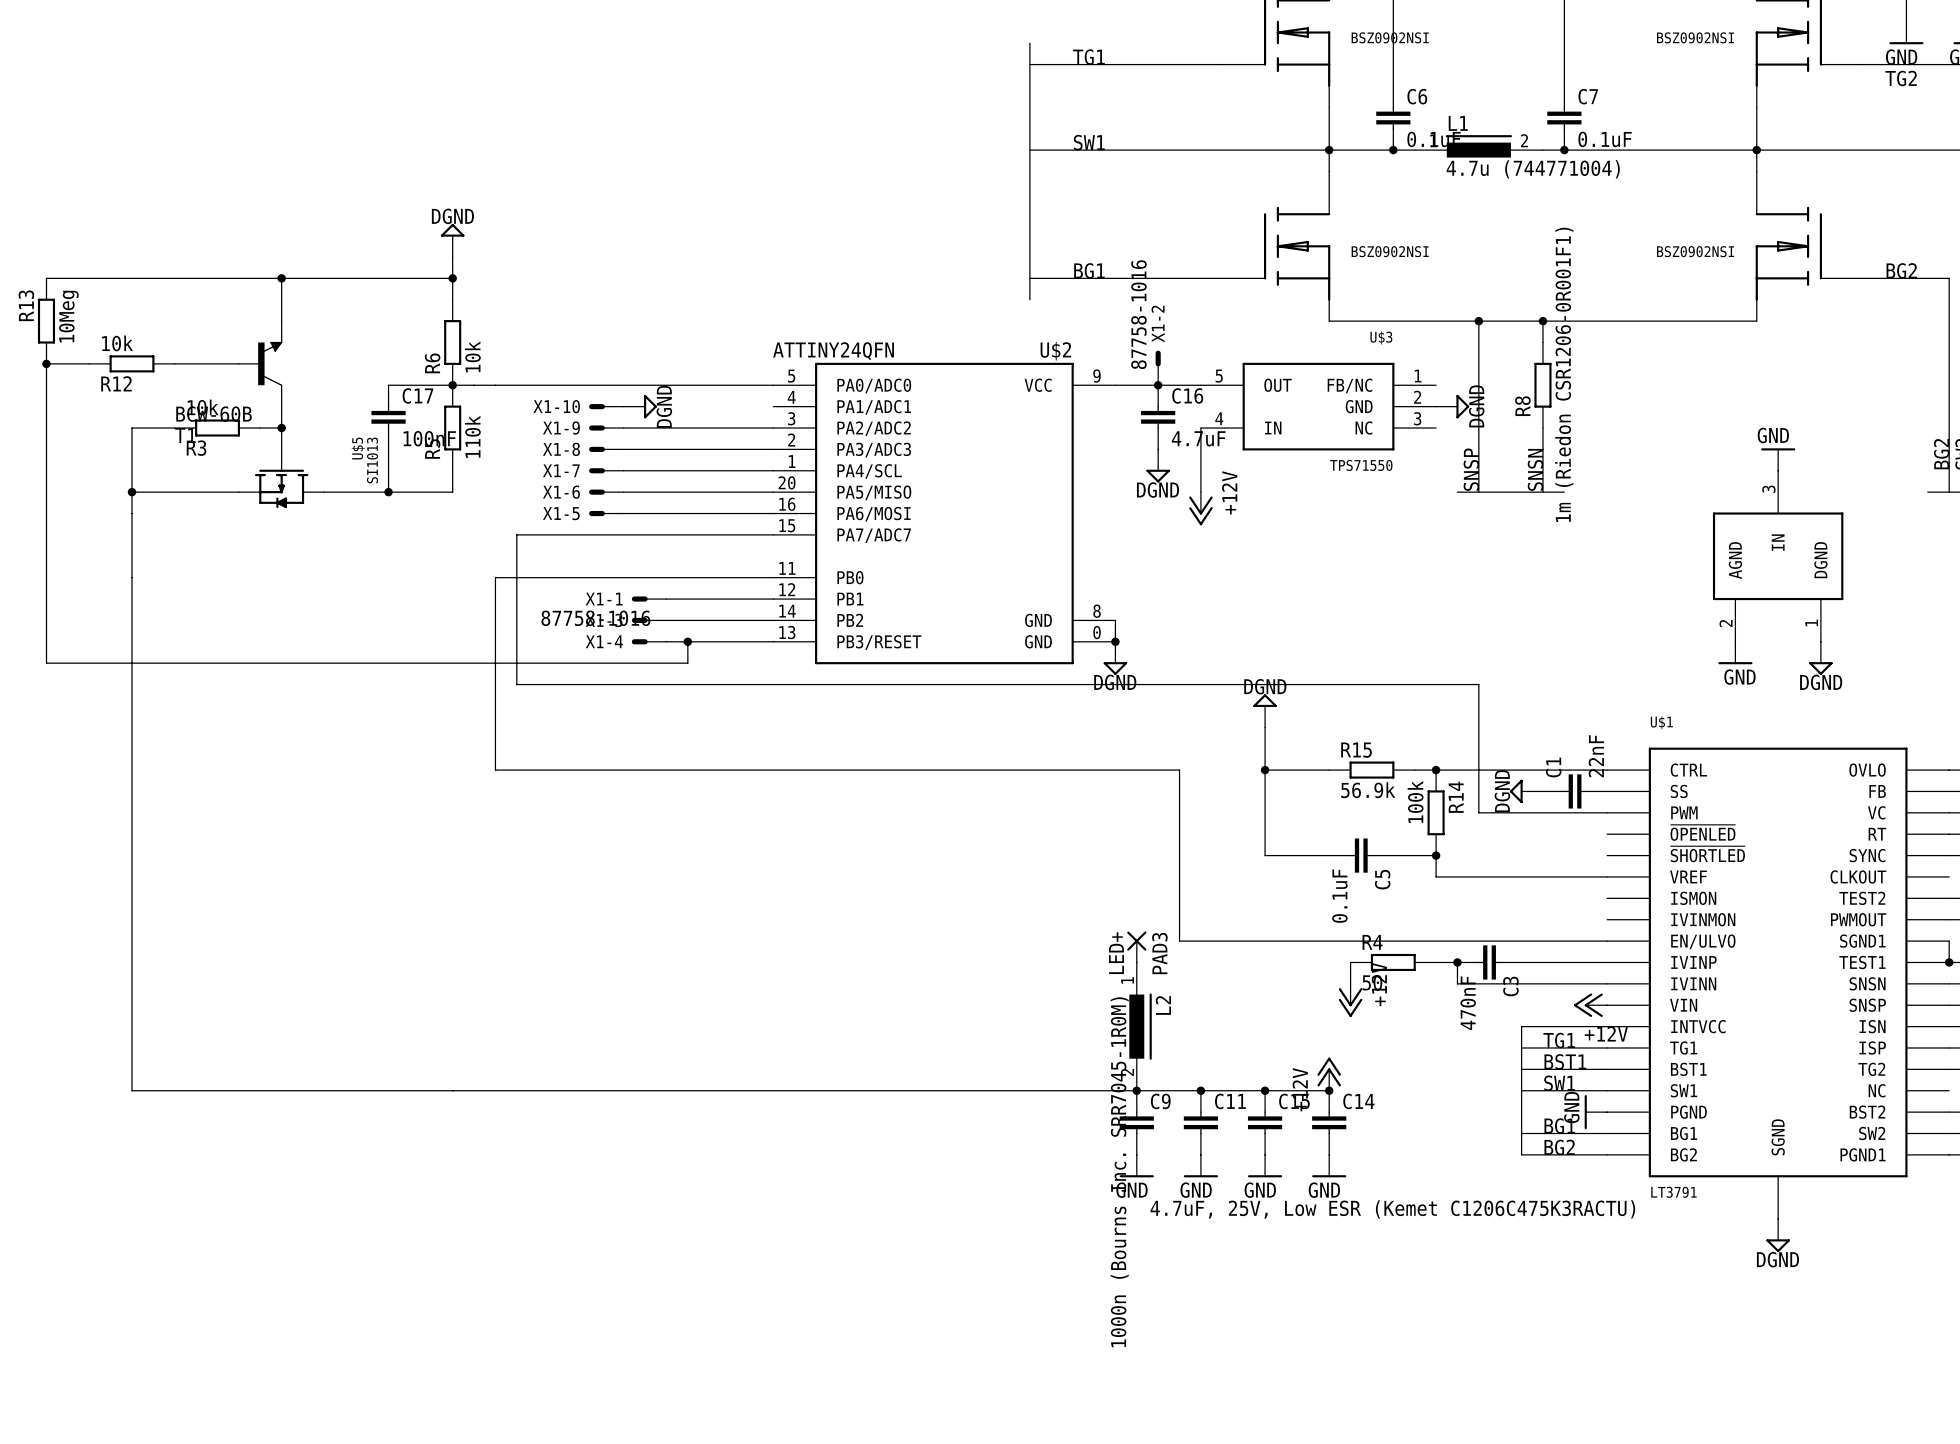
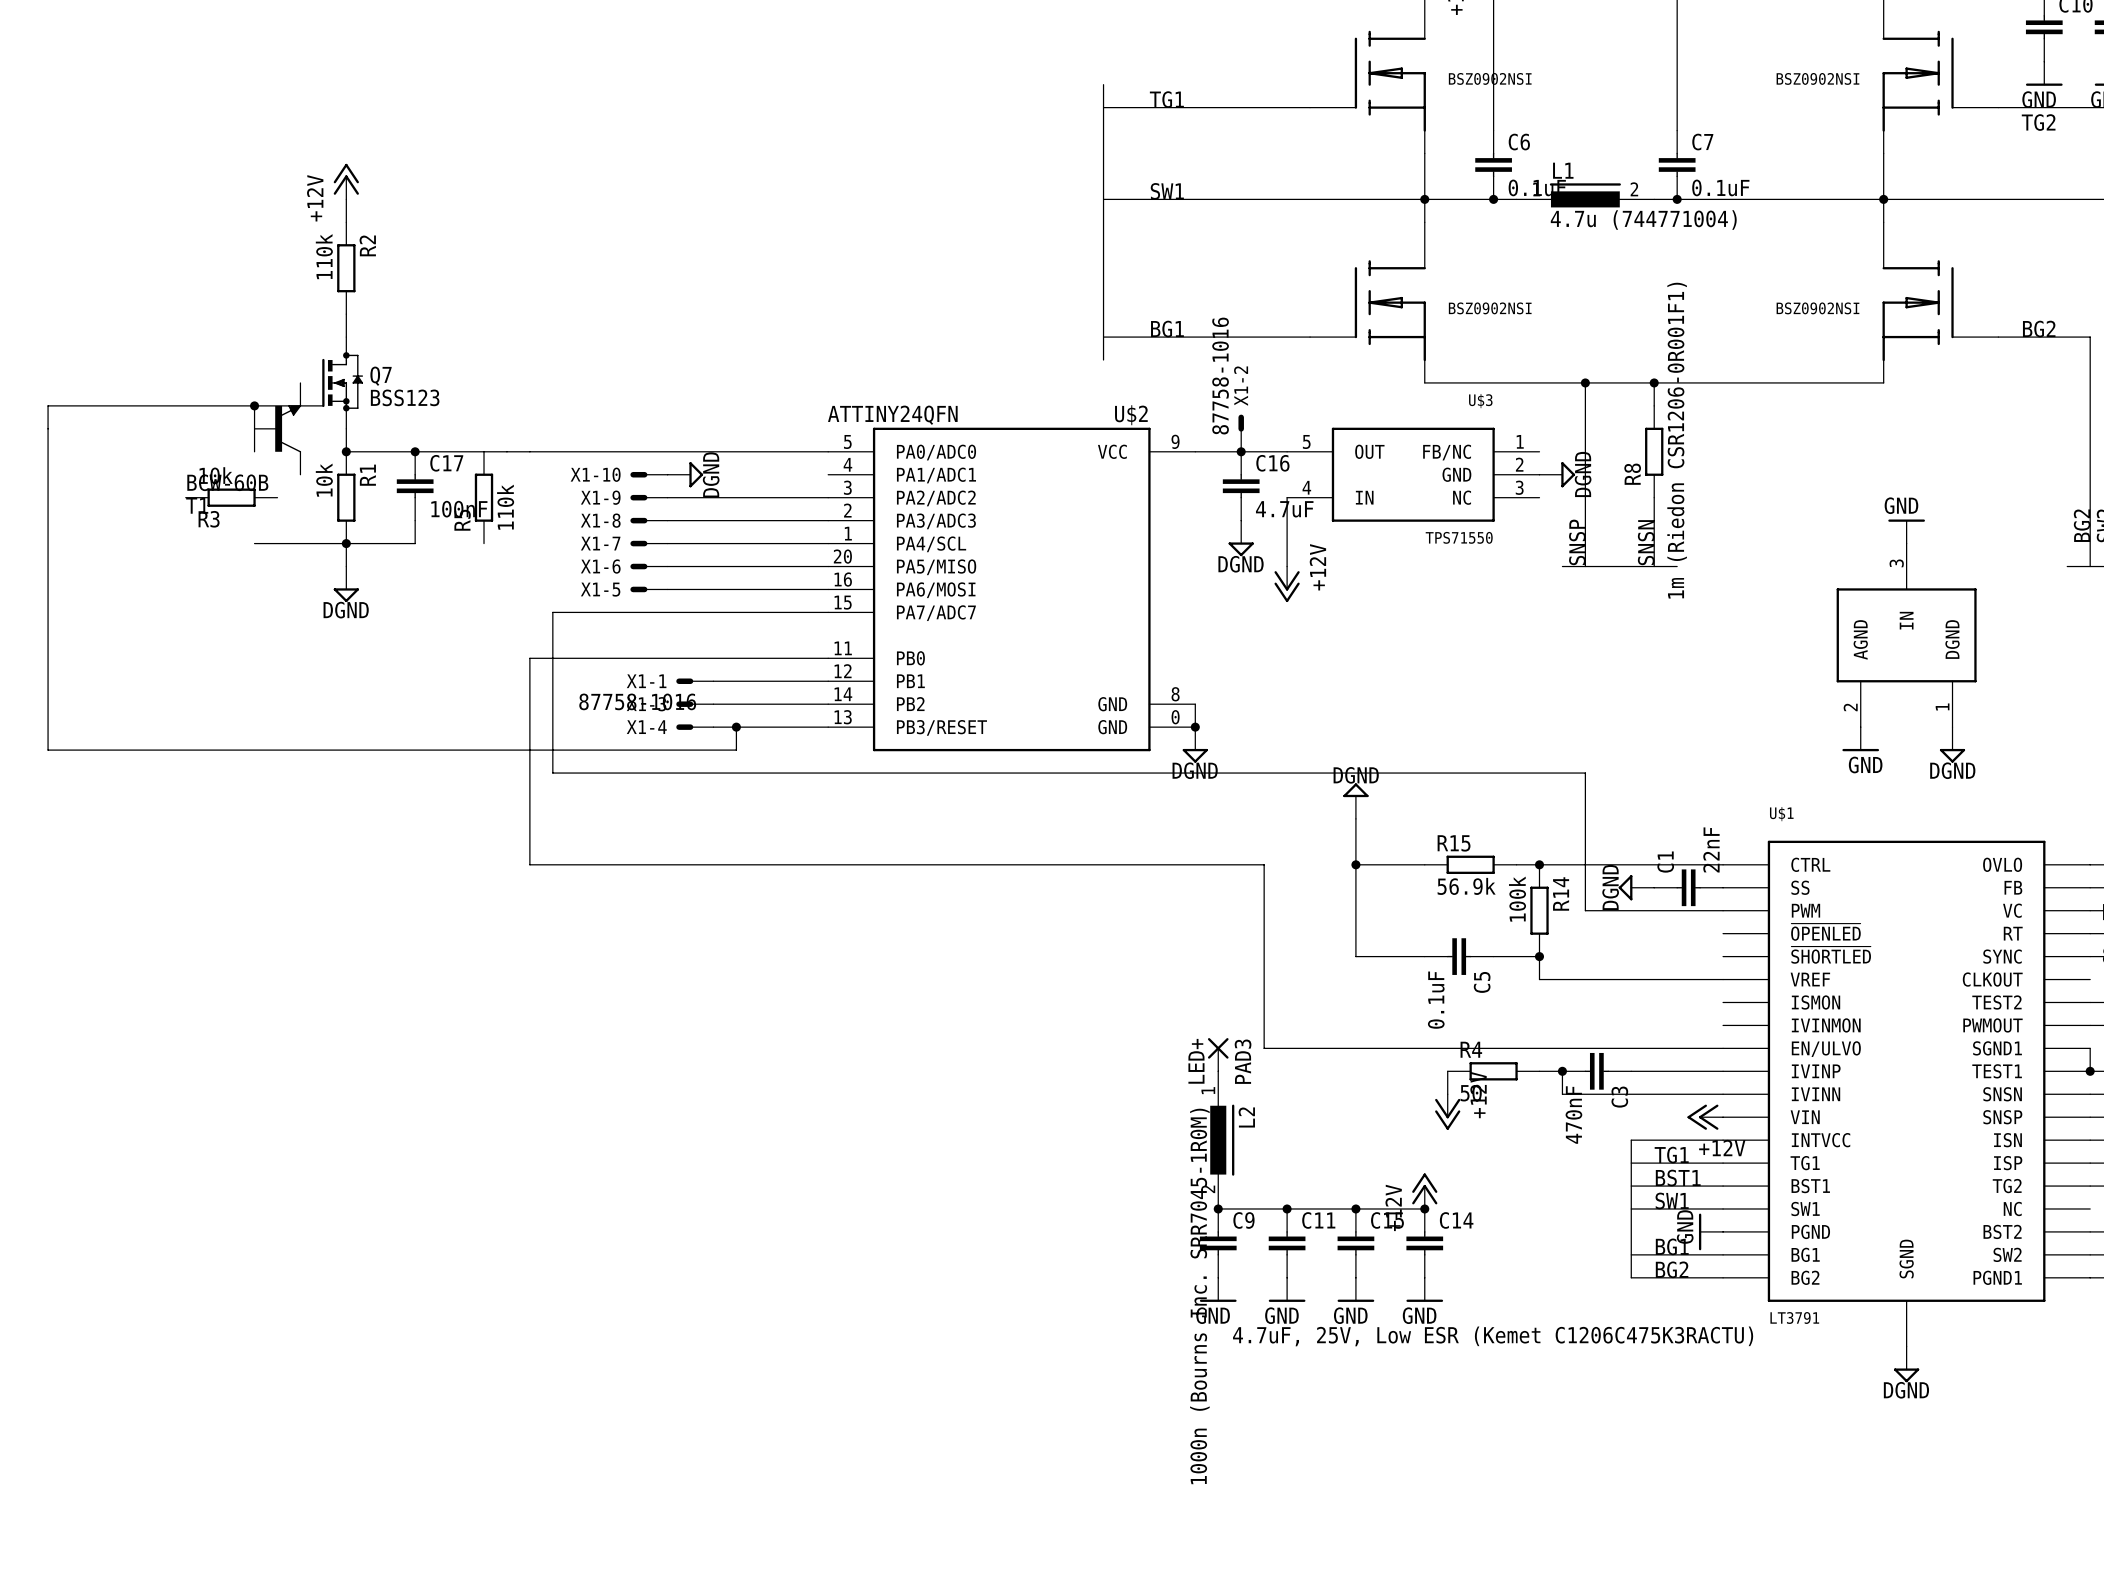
power symbol: none -> +12V (346, 181)
wire: none -> (346, 199) (346, 222)
R2: none -> 110k (346, 268)
power symbol: DGND (452, 240) -> none
wire: none -> (346, 314) (346, 337)
wire: (452, 256) (452, 299) -> none
wire: (46, 278) (452, 278) -> none
wire: (281, 278) (281, 321) -> (254, 405) (254, 451)
junction: (281, 278) -> none
junction: (452, 278) -> none
R13: 10Meg (46, 321) -> none
Q7: none -> BSS123 (331, 382)
junction: none -> (254, 405)
R6: 10k (452, 342) -> none
wire: (46, 363) (89, 363) -> (48, 428) (48, 405) (300, 405)
junction: (46, 363) -> none
R12: 10k (132, 363) -> none
wire: (174, 363) (238, 363) -> none
wire: none -> (346, 428) (346, 451) (415, 451)
junction: none -> (346, 451)
junction: none -> (415, 451)
junction: (452, 385) -> none
wire: (281, 406) (281, 449) -> none
wire: (174, 428) (132, 428) (132, 1090) (1136, 1090) -> none
wire: (260, 428) (281, 428) -> none
junction: (281, 428) -> none
R1: none -> 10k (346, 497)
junction: none -> (346, 543)
wire: (388, 470) (388, 492) -> (415, 543) (254, 543)
wire: (452, 470) (452, 492) (324, 492) -> (346, 543) (346, 566)
U$5: SI1013 (281, 478) -> none
wire: (132, 492) (238, 492) -> none
junction: (132, 492) -> none
junction: (388, 492) -> none
power symbol: none -> DGND (346, 584)

